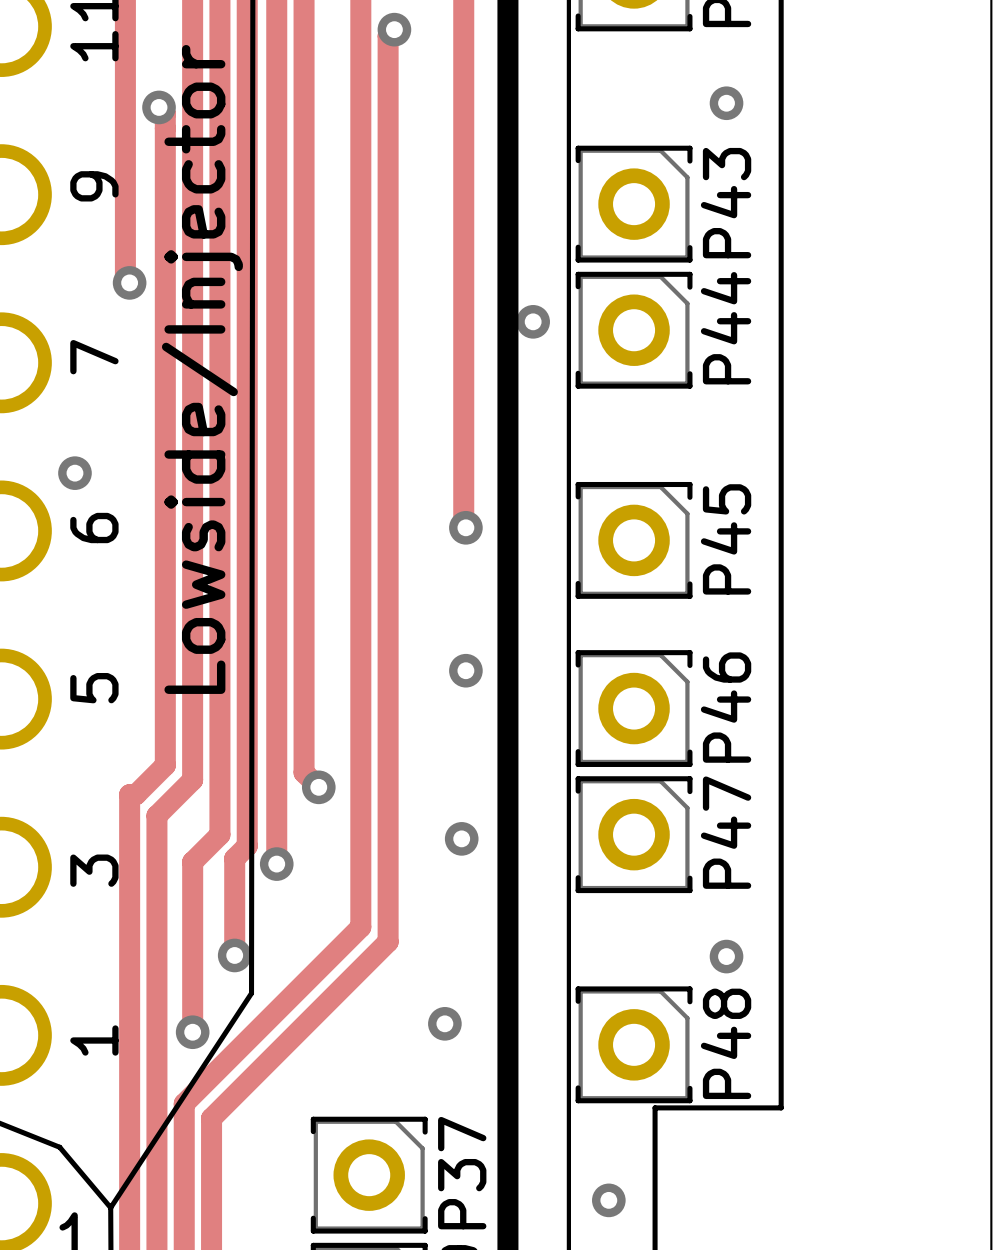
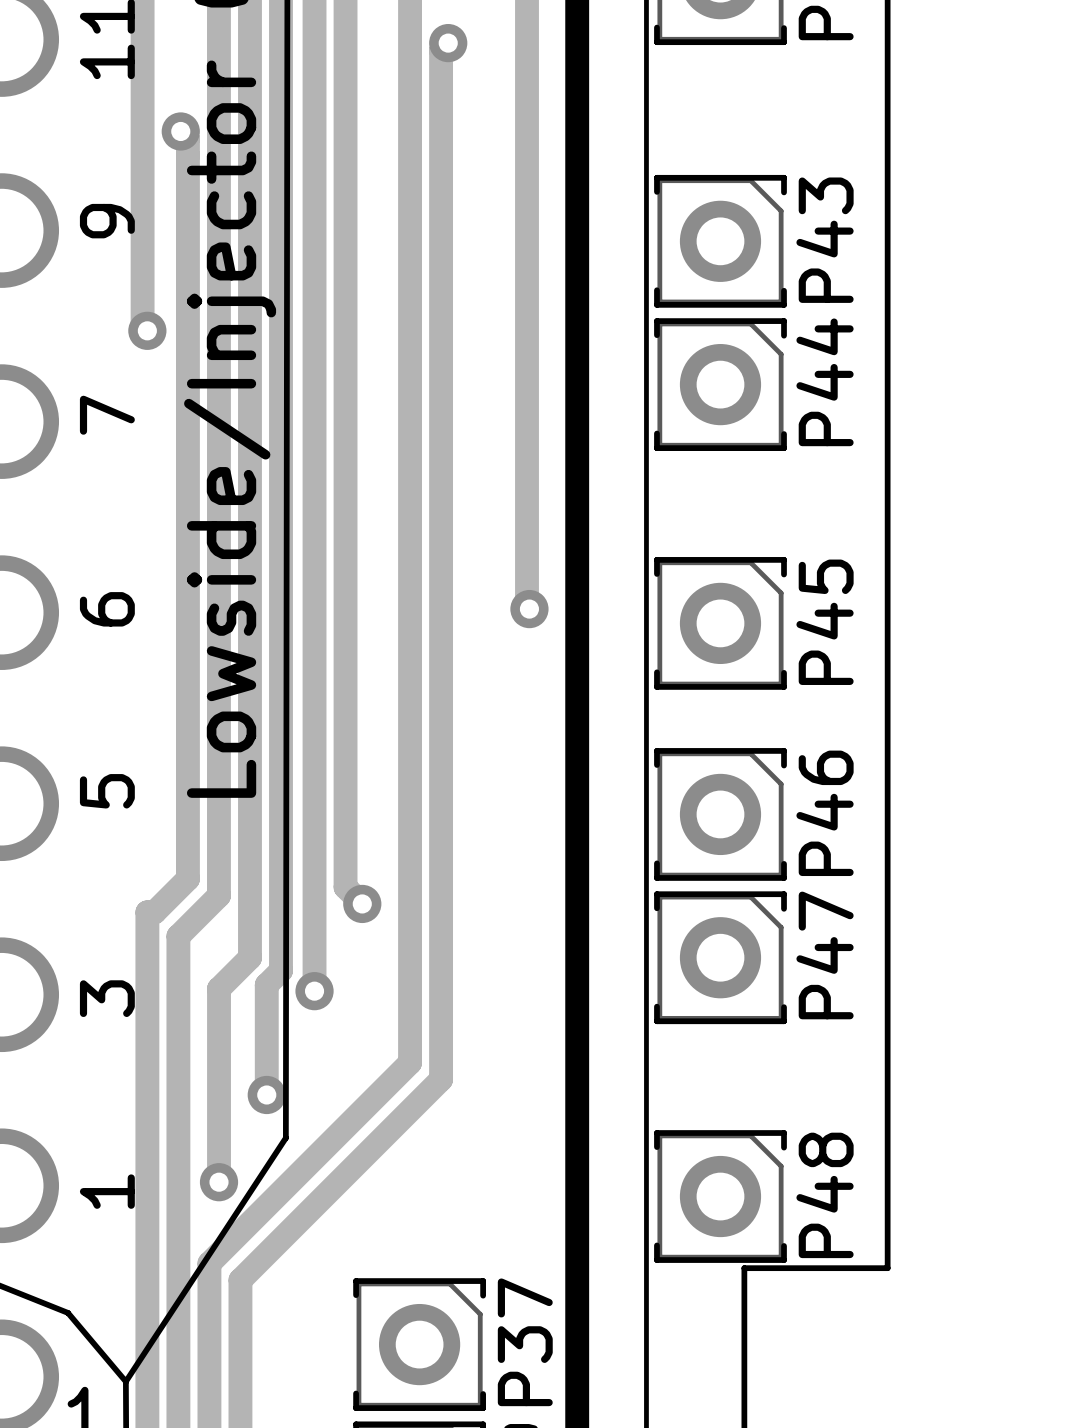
via: (726, 103) -> none
via: (533, 321) -> none
via: (74, 473) -> none
via: (465, 670) -> none
via: (461, 838) -> none
via: (726, 956) -> none
via: (444, 1023) -> none
via: (608, 1200) -> none

